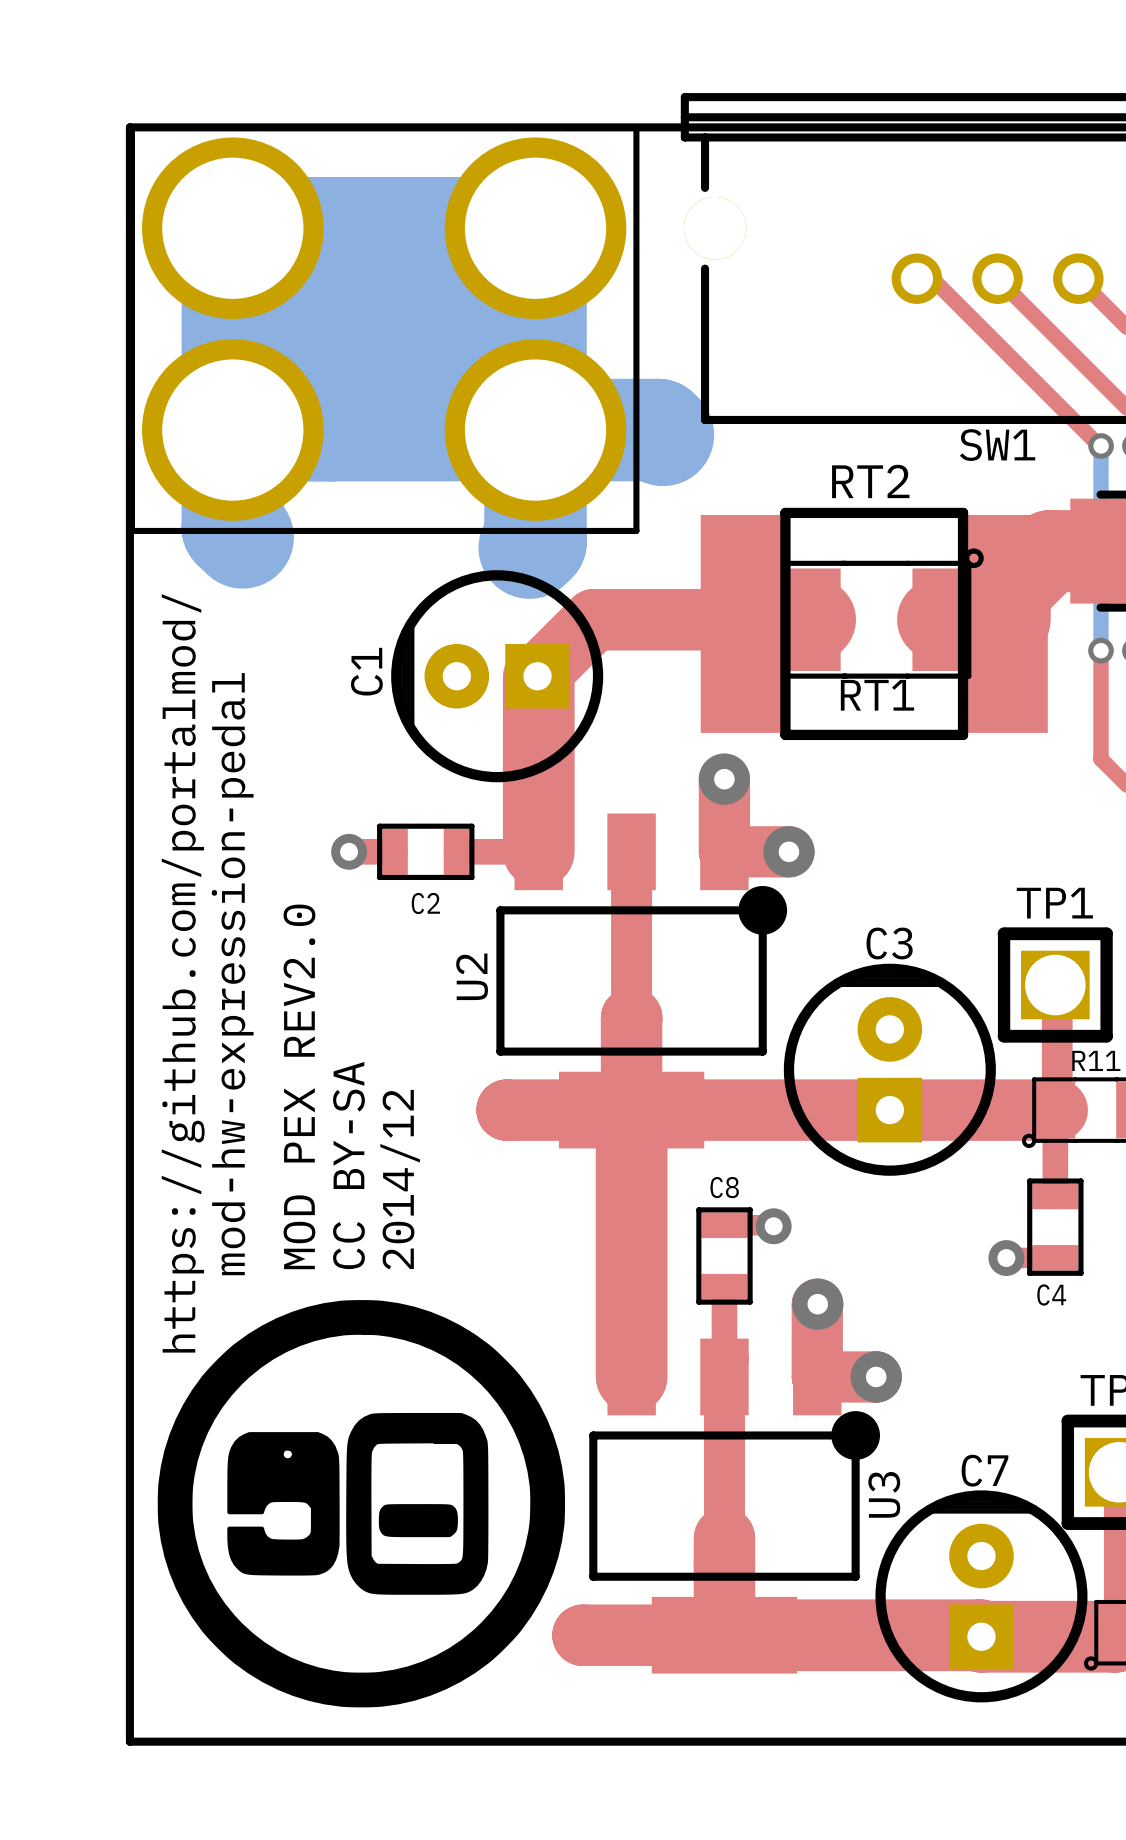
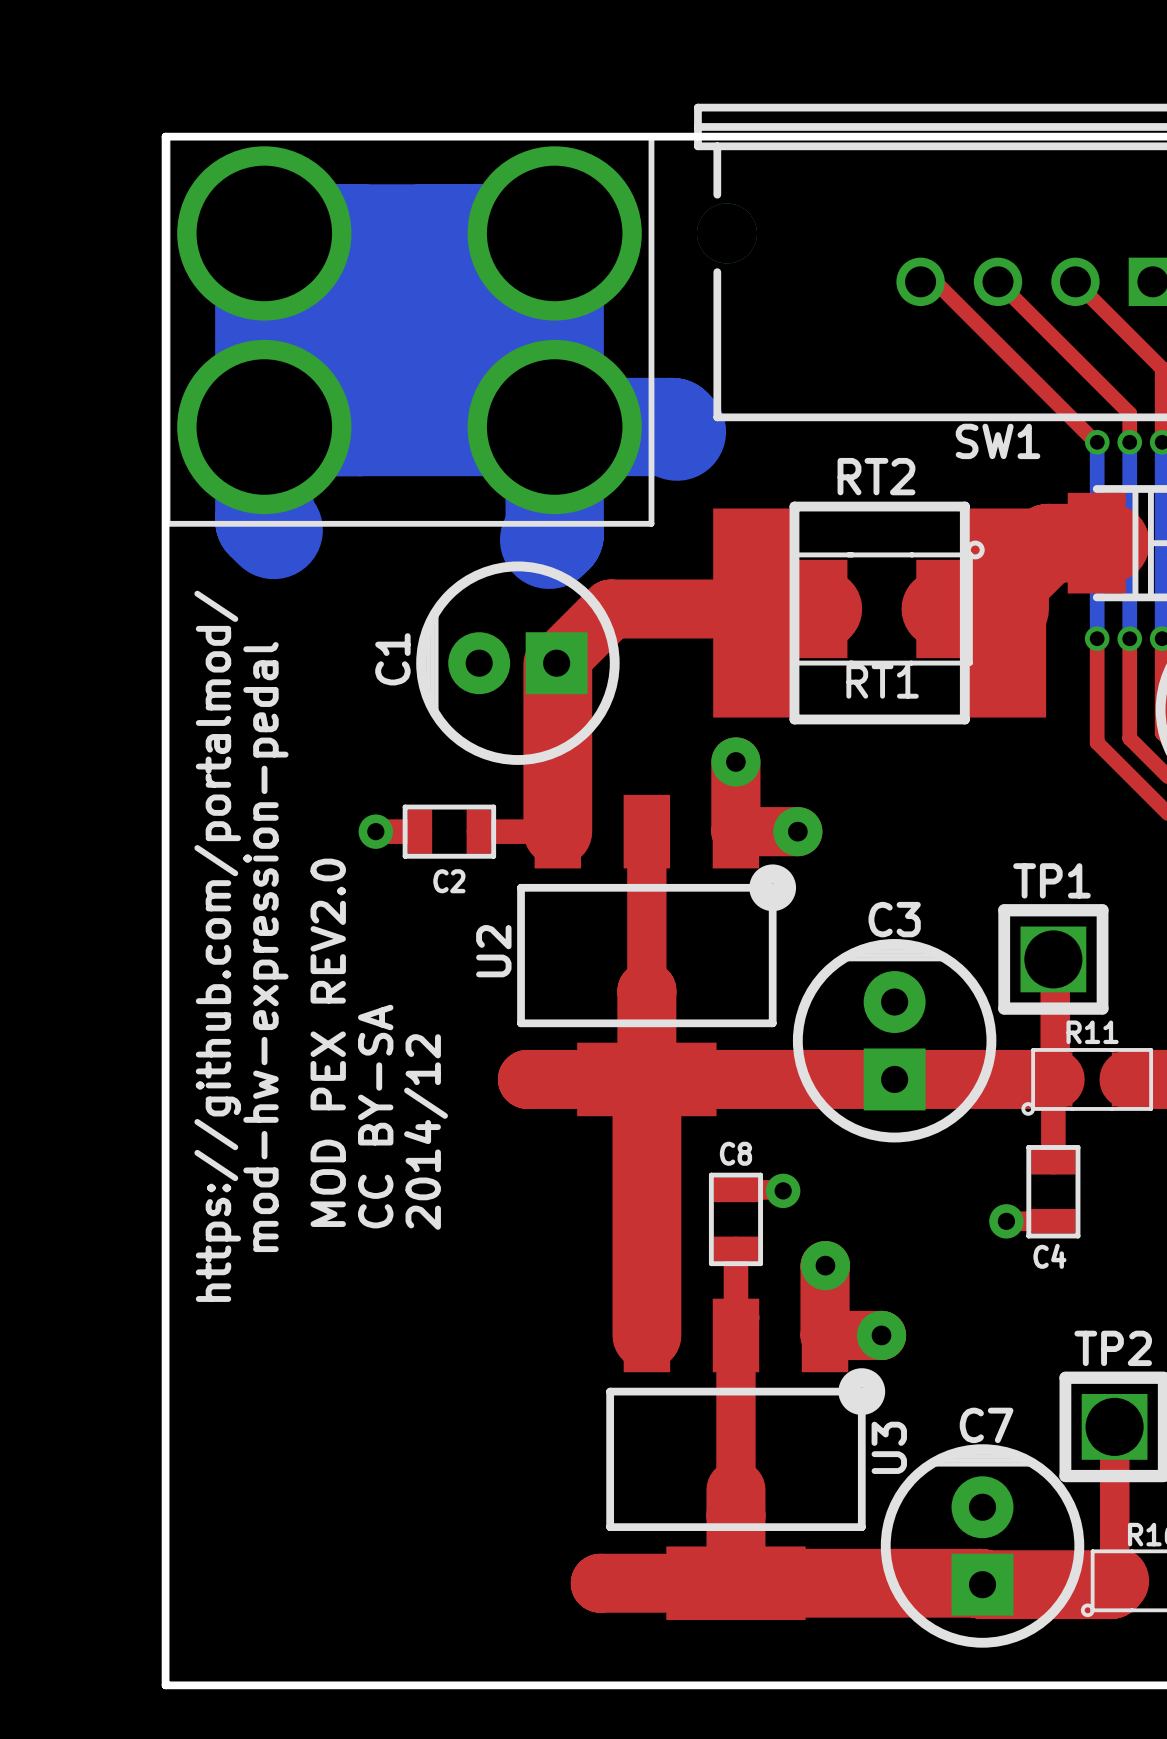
drawing: [157, 1300, 566, 1708] -> none

